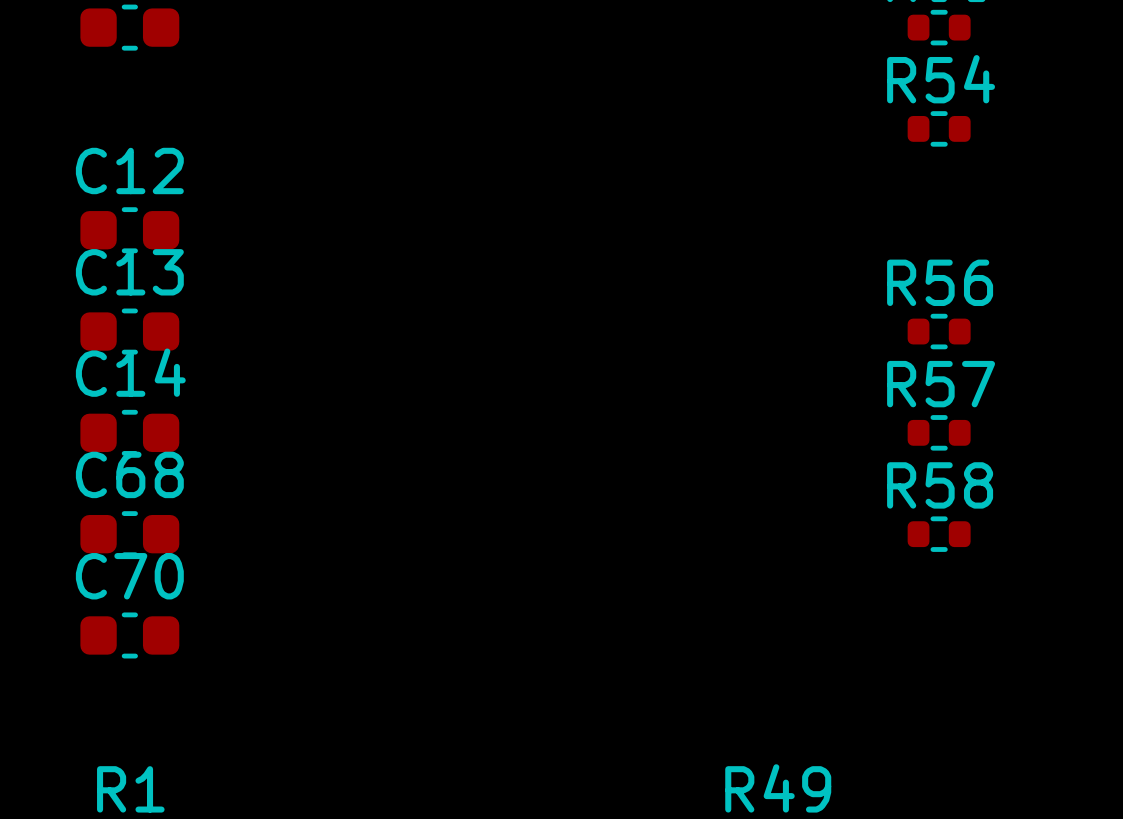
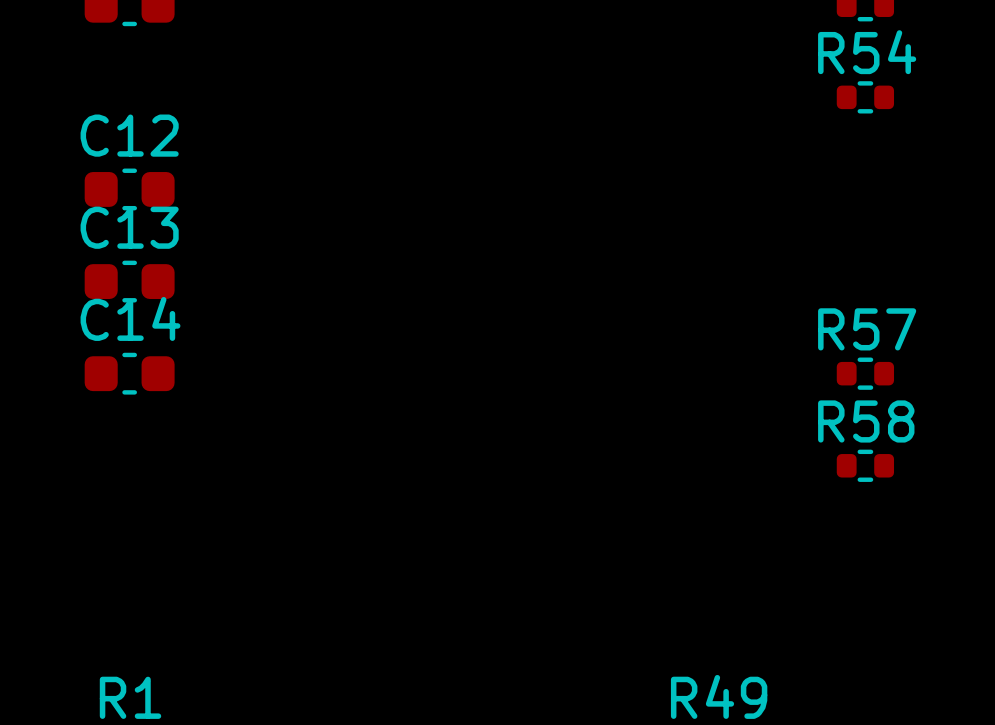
R56: (939, 331) -> none
C68: (129, 534) -> none
C70: (129, 635) -> none

